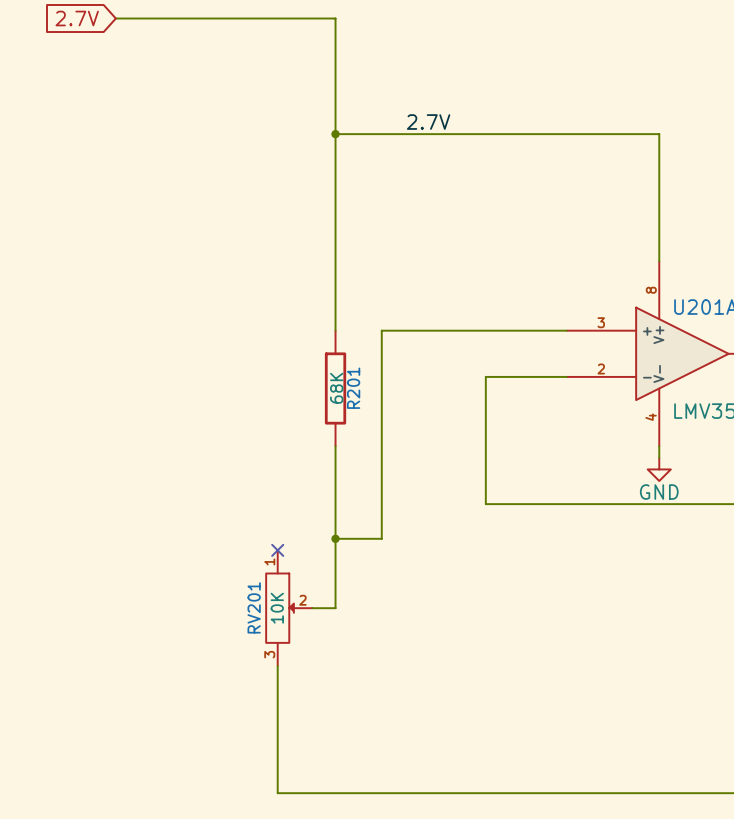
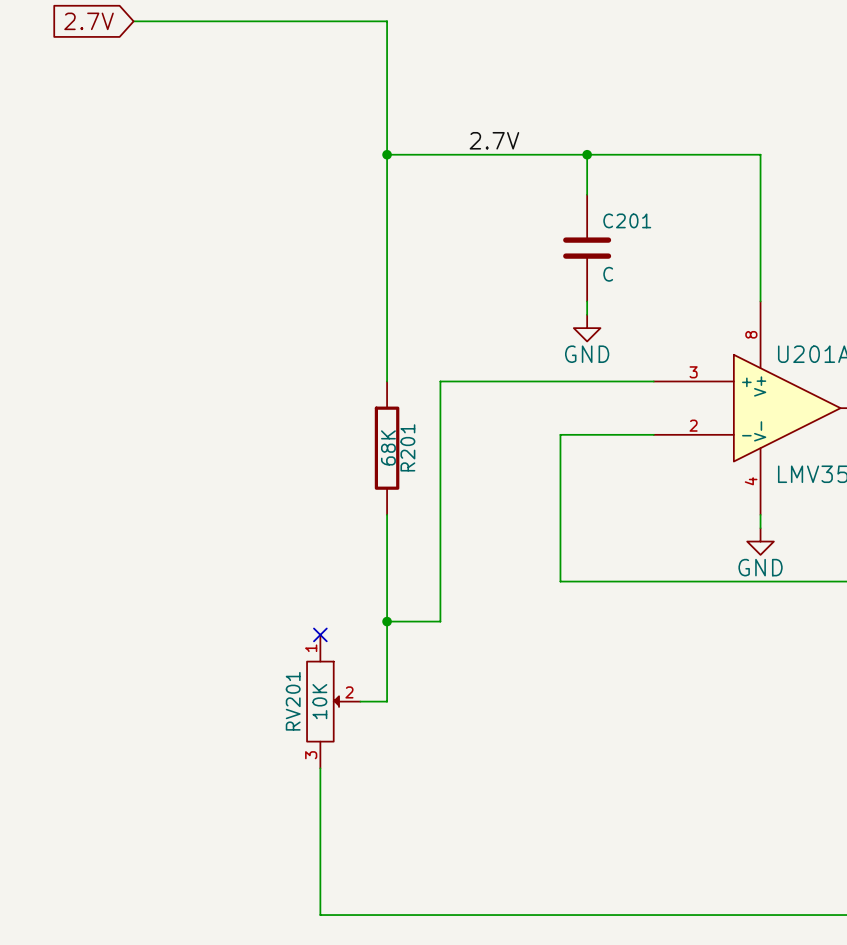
wire: none -> (587, 154) (587, 194)
junction: none -> (587, 154)
C201: none -> C (587, 248)
wire: none -> (587, 301) (587, 314)
power symbol: none -> GND (587, 328)

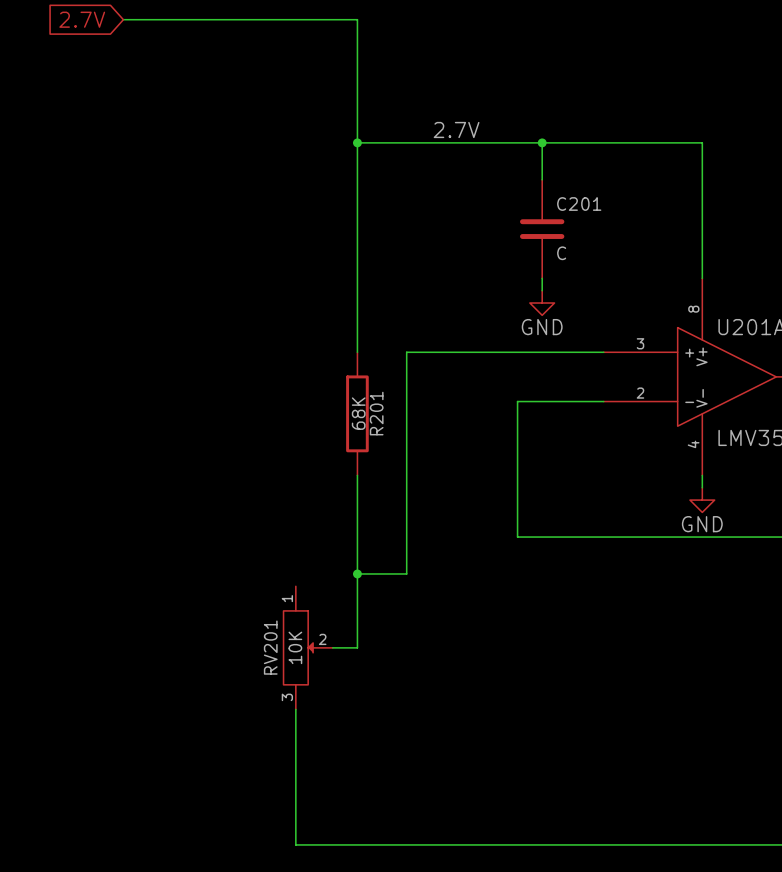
no-connect mark: (320, 634) -> none

